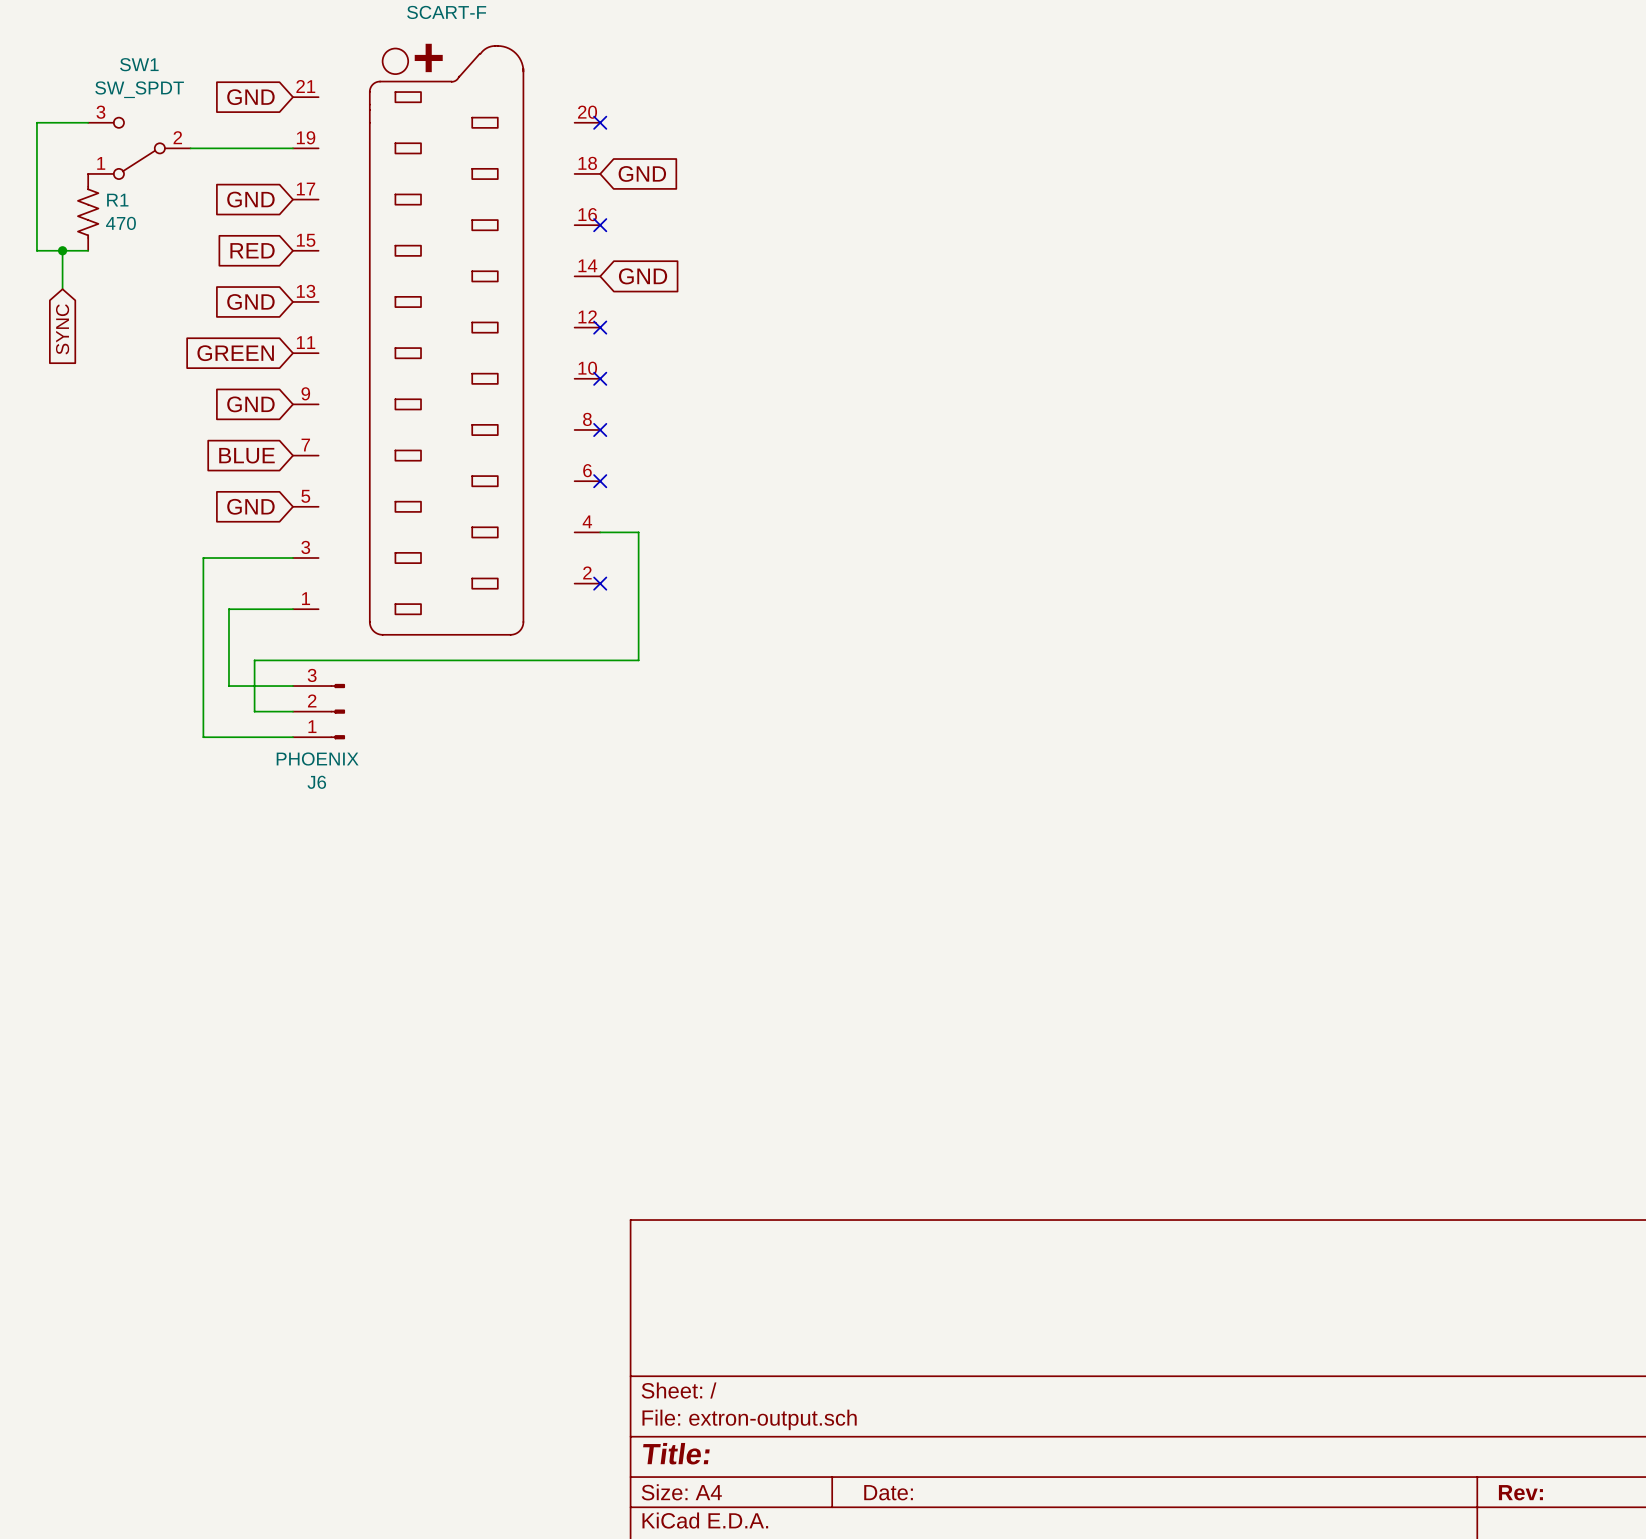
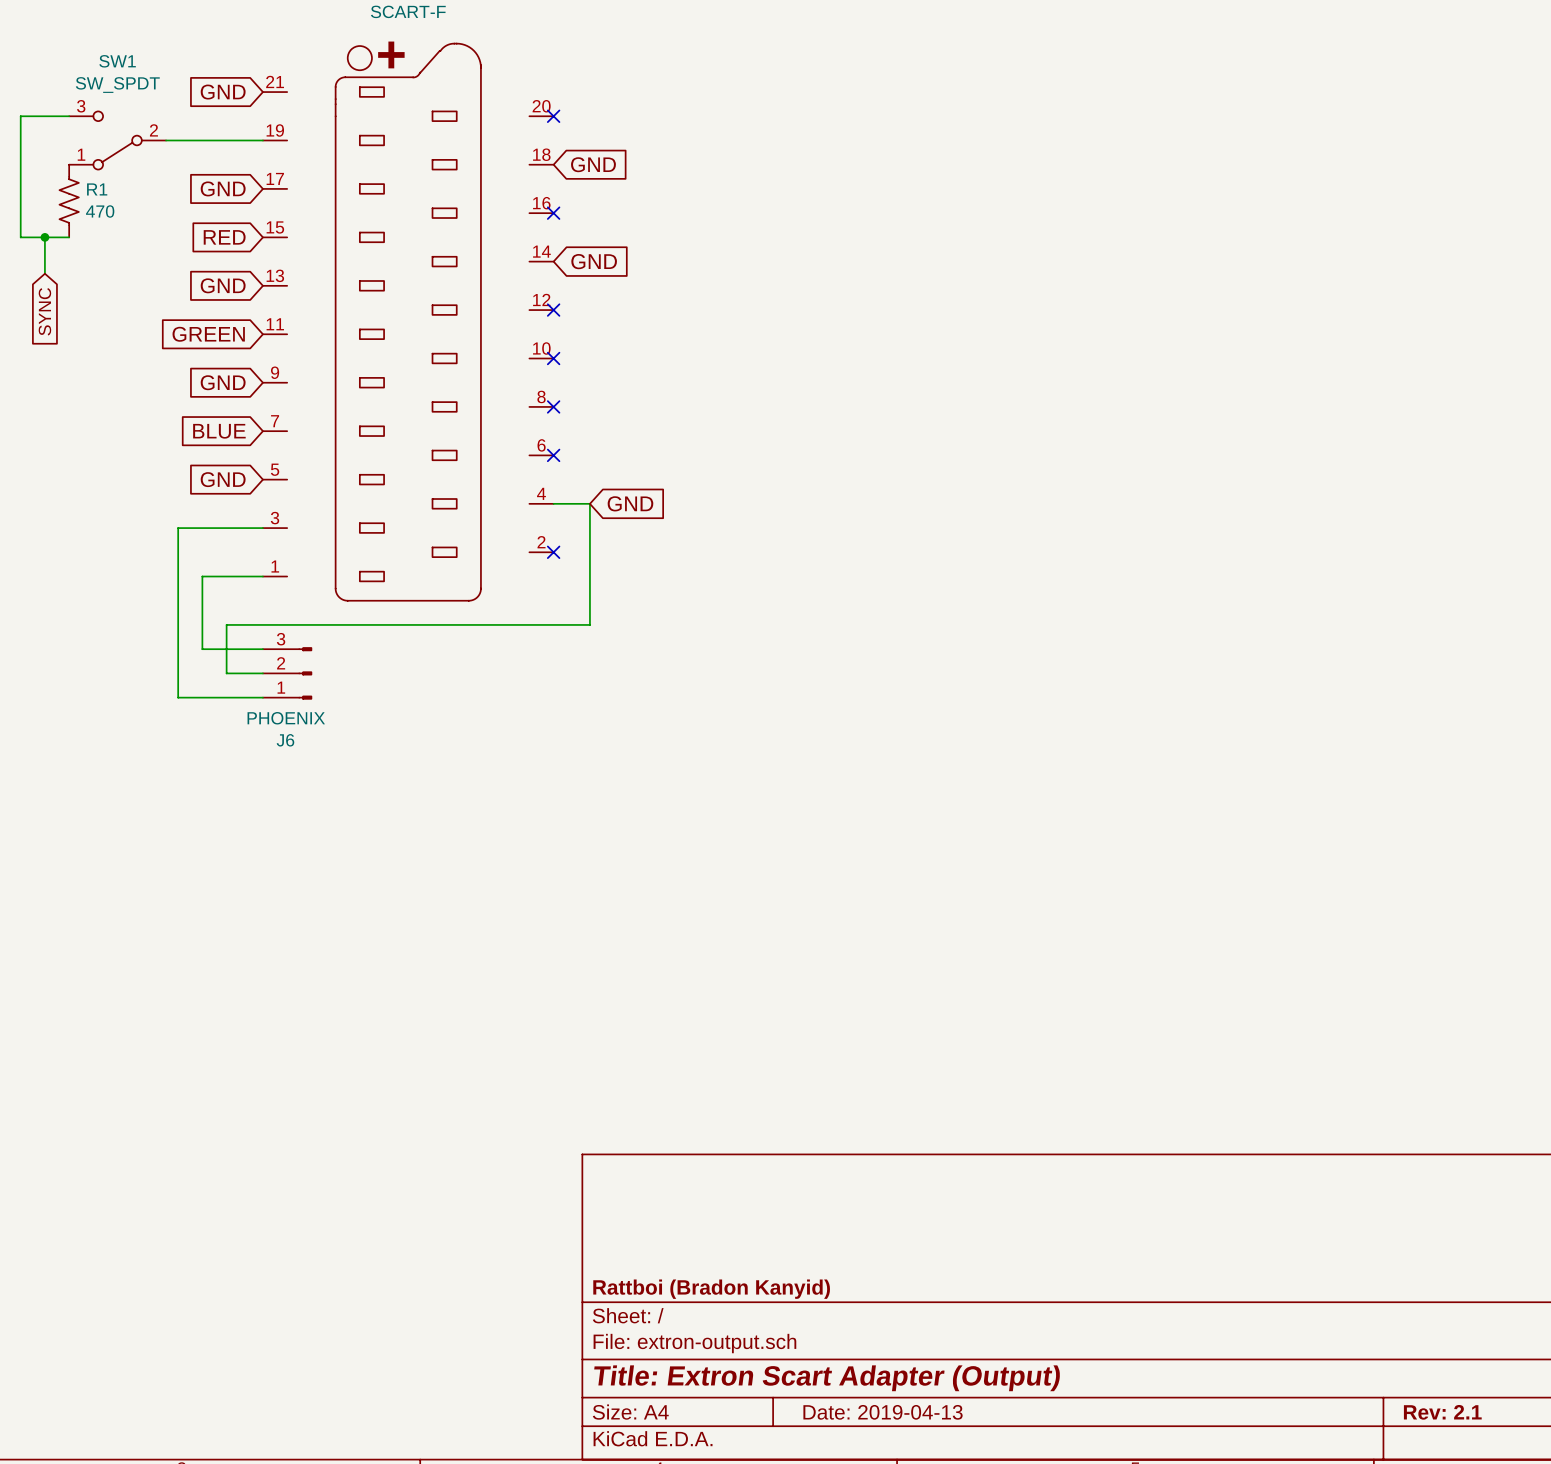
global label: none -> GND (630, 503)
title block: none -> Rattboi (Bradon Kanyid) (711, 1289)
title block: Title: (676, 1453) -> Title: Extron Scart Adapter (Output) (827, 1378)
title block: Date: (888, 1492) -> Date: 2019-04-13 (883, 1412)
title block: Rev: (1520, 1492) -> Rev: 2.1 (1442, 1412)

